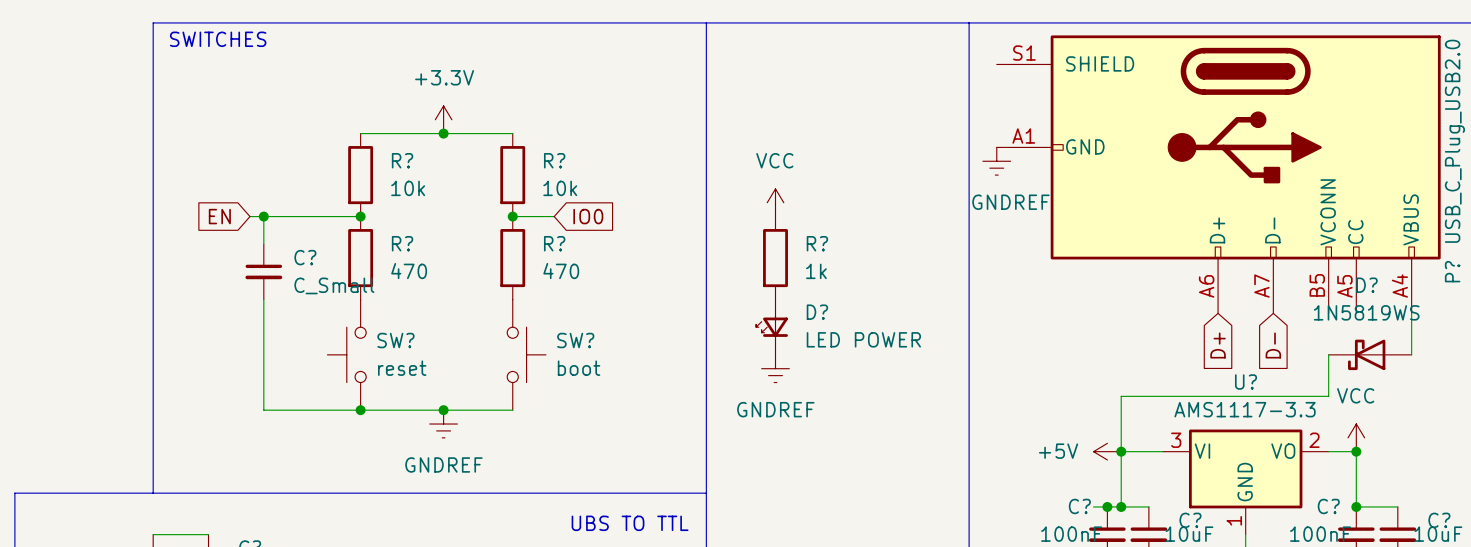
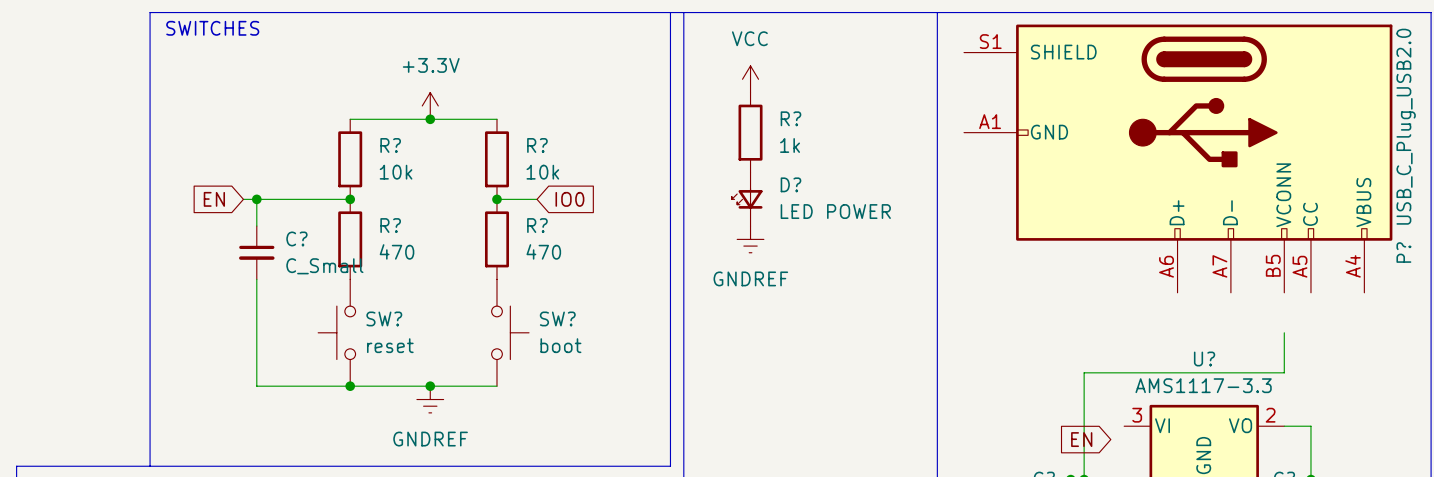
power symbol: GNDREF (996, 161) -> none
power symbol position: VCC (775, 202) -> VCC (750, 79)
R? position: (775, 258) -> (750, 132)
wire: (1411, 313) (1411, 354) -> none
D? position: (772, 327) -> (747, 199)
global label: D+ (1218, 345) -> none
global label: D- (1273, 345) -> none
D?: 1N5819WS (1370, 354) -> none
power symbol position: GNDREF (775, 368) -> GNDREF (750, 239)
power symbol: VCC (1356, 437) -> none
power symbol: +5V (1107, 451) -> none
wire: (1121, 451) (1162, 451) -> none
junction: (1121, 451) -> none
junction: (1356, 451) -> none
global label: none -> EN (1081, 439)
line: (692, 493) (706, 493) -> (670, 466) (670, 12)

